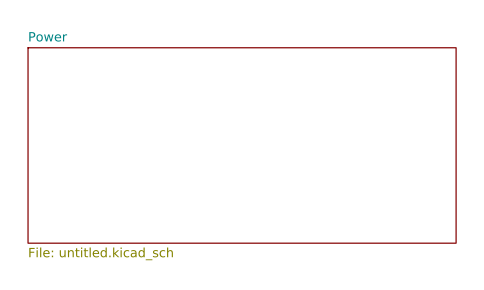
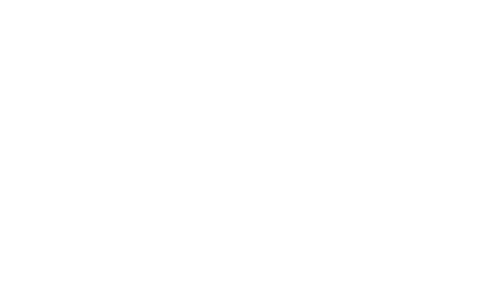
sheet Power: File: untitled.kicad_sch (242, 145) -> none

